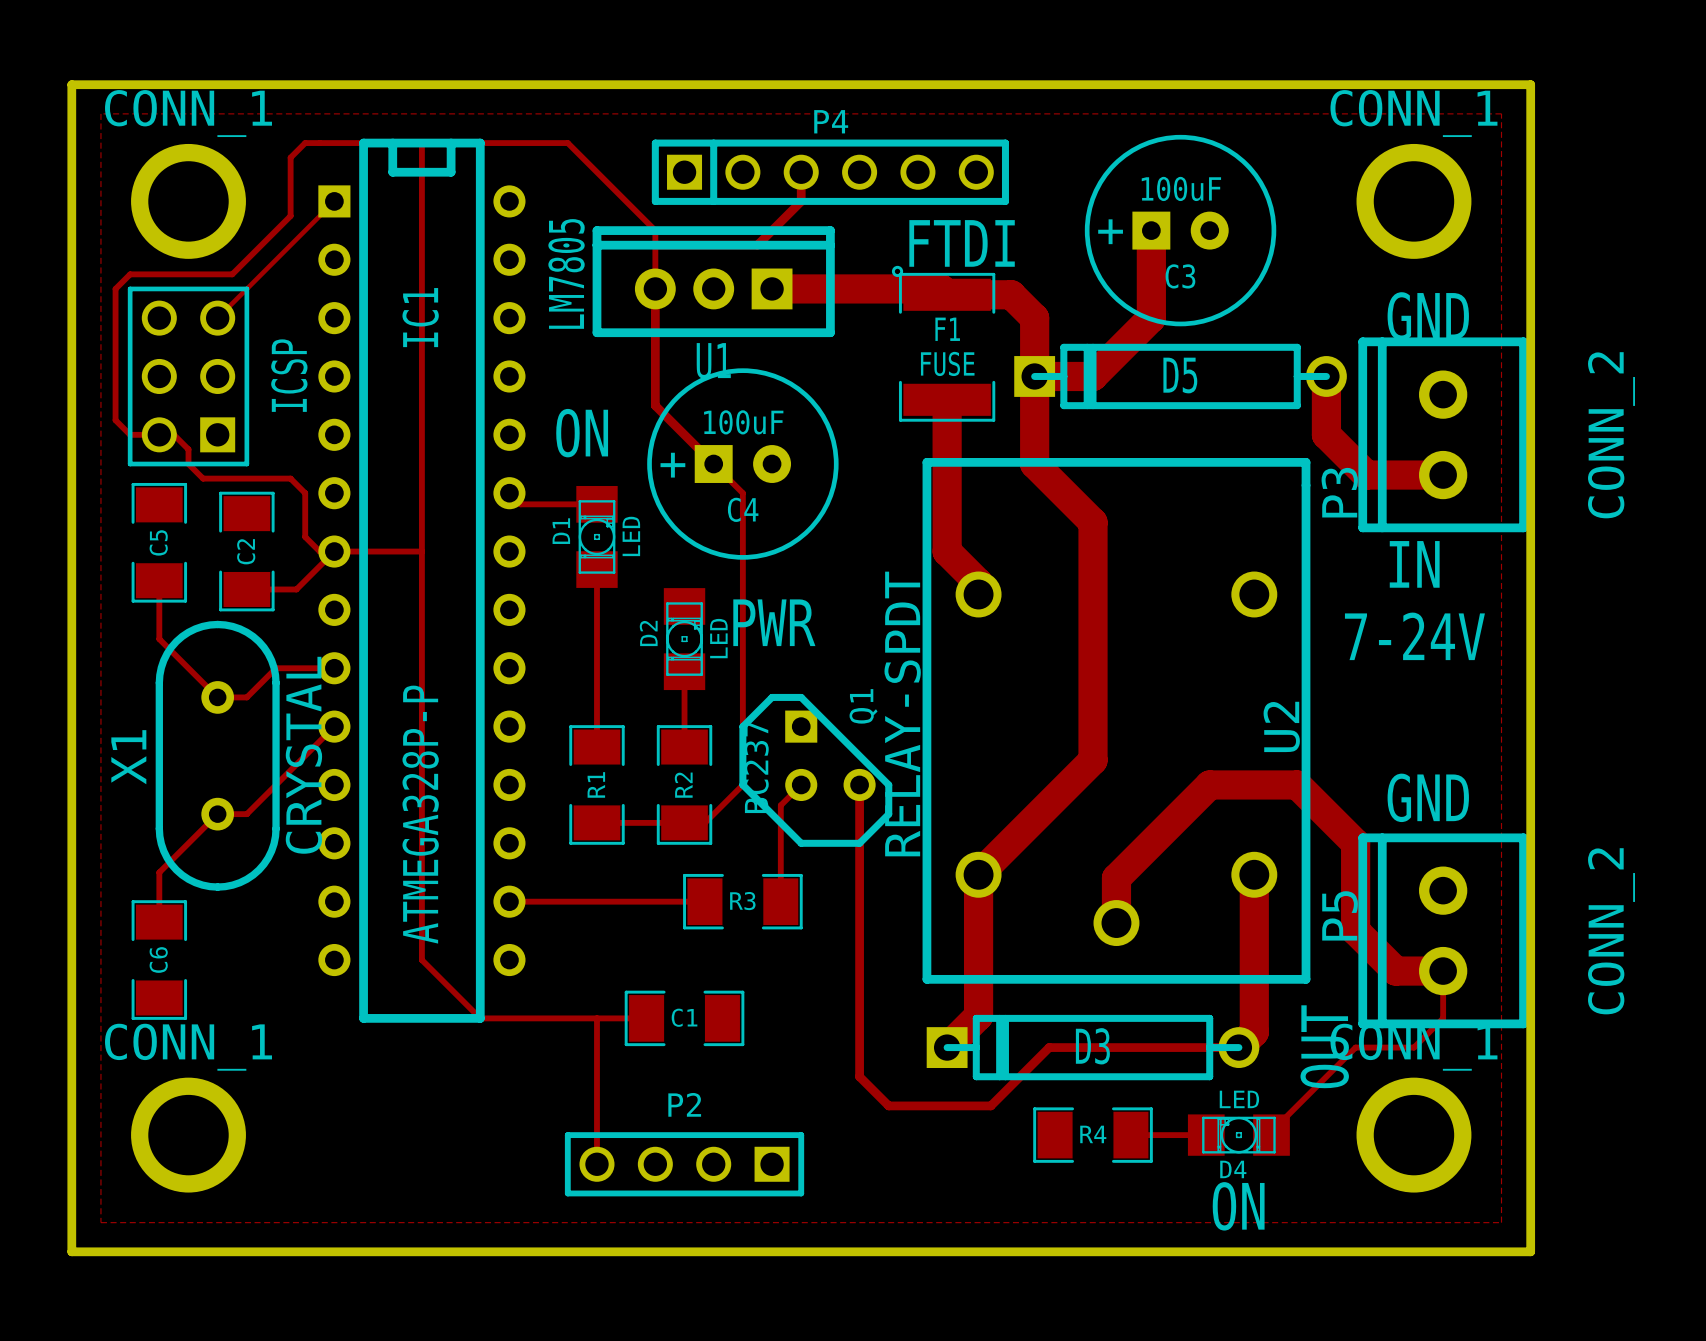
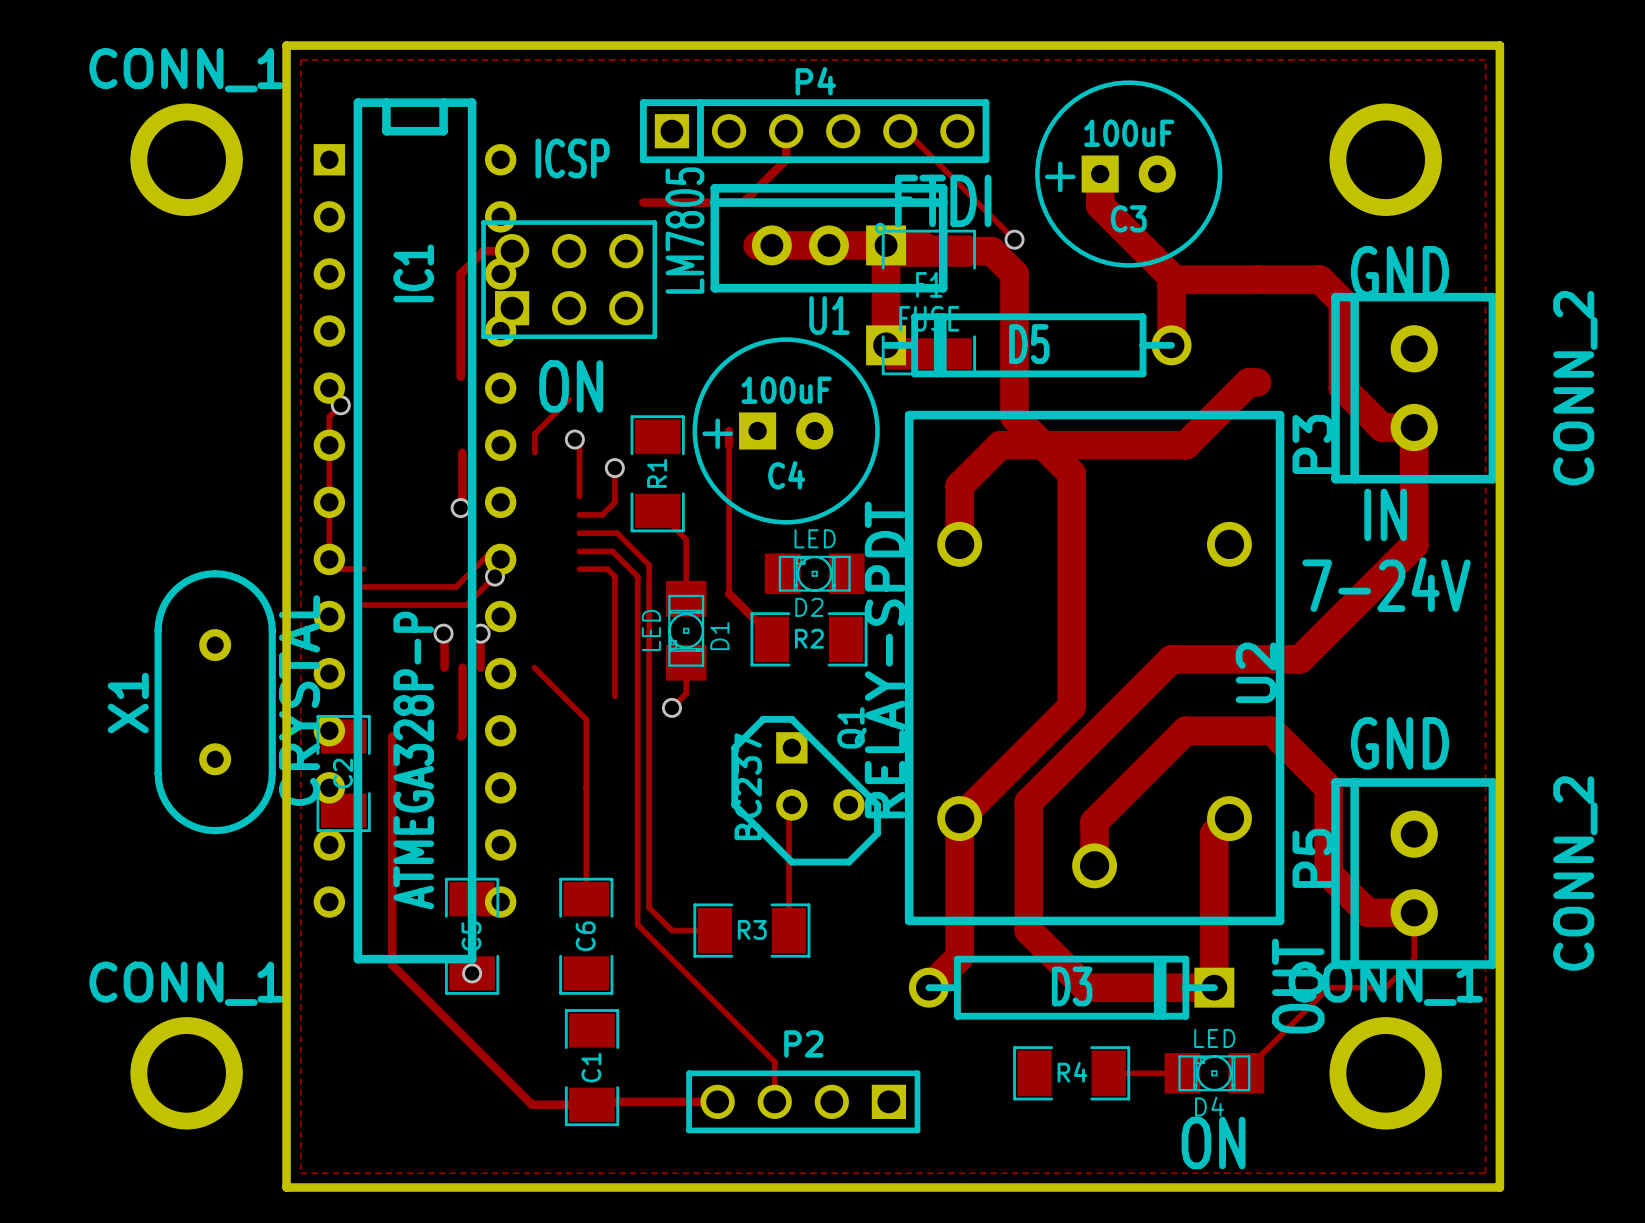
board edge: (290, 84) (71, 84) (71, 1251) (290, 1251) -> (286, 45) (286, 1187)
zone outline: (100, 113) (1501, 113) (1501, 1222) (100, 1222) (100, 113) -> (300, 59) (300, 1173) (1485, 1173) (1485, 59) (300, 59)
part value: CONN_1 (1413, 113) -> none
track: (421, 143) (421, 960) (480, 1018) (646, 1018) -> none
track: none -> (900, 131) (906, 131) (1014, 239)
track: (334, 201) (217, 318) -> none
track: none -> (1100, 174) (1100, 205) (1174, 279)
track: (1151, 230) (1151, 318) (1093, 376) (1034, 376) -> none
C3 position: (1180, 230) -> (1128, 174)
U1 position: (713, 281) -> (828, 238)
via: none -> (1014, 239)
track: none -> (886, 245) (886, 345)
track: none -> (512, 251) (483, 251) (460, 273) (460, 376)
track: none -> (1174, 279) (1171, 282) (1171, 345)
text rotation: 0° (289, 375) -> 90° clockwise (572, 158)
text position: ICSP (289, 375) -> ICSP (572, 158)
part rotation: 0° (188, 376) -> 90° clockwise (569, 279)
part position: (188, 376) -> (569, 279)
D5 position: (1180, 376) -> (1028, 345)
track: (1326, 376) (1326, 434) (1366, 475) (1410, 475) -> (1174, 279) (1320, 279) (1342, 302) (1342, 388) (1382, 427)
track: (947, 399) (947, 551) (978, 583) -> (1257, 382) (1248, 382) (1185, 445) (1000, 445) (959, 485) (959, 533)
track: none -> (569, 399) (534, 433) (534, 452)
track: none -> (340, 405) (329, 416) (329, 565) (333, 569) (363, 569)
via: none -> (340, 405)
C4 position: (742, 464) -> (786, 430)
track: none -> (574, 439) (579, 444) (579, 496)
via: none -> (574, 439)
track: (509, 493) (520, 504) (596, 504) -> none
track: (742, 493) (655, 405) (655, 230) (567, 143) (305, 143) (290, 157) (290, 216) (232, 274) (130, 274) (115, 288) (115, 420) (130, 434) (173, 434) (188, 449) (188, 464) (203, 478) (290, 478) (305, 493) (305, 536) (319, 551) (421, 551) -> (729, 445) (729, 430)
track: none -> (462, 452) (462, 506) (460, 508)
track: none -> (614, 468) (614, 502) (602, 514) (579, 514)
via: none -> (614, 468)
D1 rotation: 0° (596, 536) -> 180° (686, 630)
D1 position: (596, 536) -> (686, 630)
C5 position: (159, 542) -> (472, 936)
C2 position: (246, 551) -> (343, 773)
track: (334, 551) (296, 589) (246, 589) -> none
via: none -> (460, 508)
track: none -> (657, 510) (686, 539) (686, 598)
track: (596, 569) (596, 747) -> none
track: (159, 580) (159, 639) (217, 697) -> none
track: none -> (579, 533) (617, 533) (649, 565) (649, 907) (671, 930) (714, 930)
track: none -> (494, 548) (456, 586) (363, 586)
track: none -> (579, 551) (612, 551) (637, 576) (637, 924) (774, 1061) (774, 1101)
track: none -> (579, 569) (607, 569) (614, 576) (614, 696)
text: PWR (774, 622) -> none
track: none -> (494, 576) (466, 605) (363, 605)
via: none -> (494, 576)
D2 rotation: 0° (684, 639) -> 90° counterclockwise (814, 573)
D2 position: (684, 639) -> (814, 573)
track: (742, 644) (742, 784) (704, 822) (596, 822) -> (729, 593) (771, 636) (771, 639)
track: (334, 668) (276, 668) (246, 697) (214, 697) -> none
track: (684, 671) (684, 747) -> none
track: none -> (443, 633) (444, 667)
via: none -> (443, 633)
track: none -> (480, 633) (480, 667)
via: none -> (480, 633)
track: none -> (686, 662) (686, 693) (671, 707)
track: none -> (462, 667) (462, 734) (460, 736)
track: none -> (534, 667) (586, 719) (586, 899)
track: (334, 726) (246, 814) (217, 814) (159, 872) (159, 922) -> none
via: none -> (671, 707)
Q1 position: (815, 770) -> (806, 790)
R1 position: (596, 784) -> (657, 473)
R2 rotation: 0° (684, 784) -> 90° clockwise (808, 639)
R2 position: (684, 784) -> (808, 639)
track: (801, 784) (780, 805) (780, 901) -> none
track: (859, 784) (859, 1076) (888, 1105) (990, 1105) (1049, 1047) (1107, 1047) -> (1414, 427) (1414, 545) (1300, 659) (1171, 659) (1028, 802) (1028, 930) (1085, 987)
track: none -> (392, 736) (392, 964) (532, 1104) (592, 1104) (594, 1101) (717, 1101)
track: none -> (791, 804) (789, 807) (789, 930)
track: (1254, 874) (1254, 1032) (1238, 1047) -> (1229, 818) (1214, 833) (1214, 987)
track: (509, 901) (704, 901) -> none
R3 position: (742, 901) -> (751, 930)
C6 position: (159, 960) -> (586, 936)
track: (596, 1018) (596, 1164) -> none
C1 rotation: 0° (684, 1018) -> 90° clockwise (592, 1067)
C1 position: (684, 1018) -> (592, 1067)
via: none -> (472, 973)
D3 rotation: 0° (1093, 1047) -> 180° (1071, 987)
track width: thin (1107, 1047) (1238, 1047) -> thick (1085, 987) (1214, 987)
P2 position: (684, 1164) -> (803, 1101)

